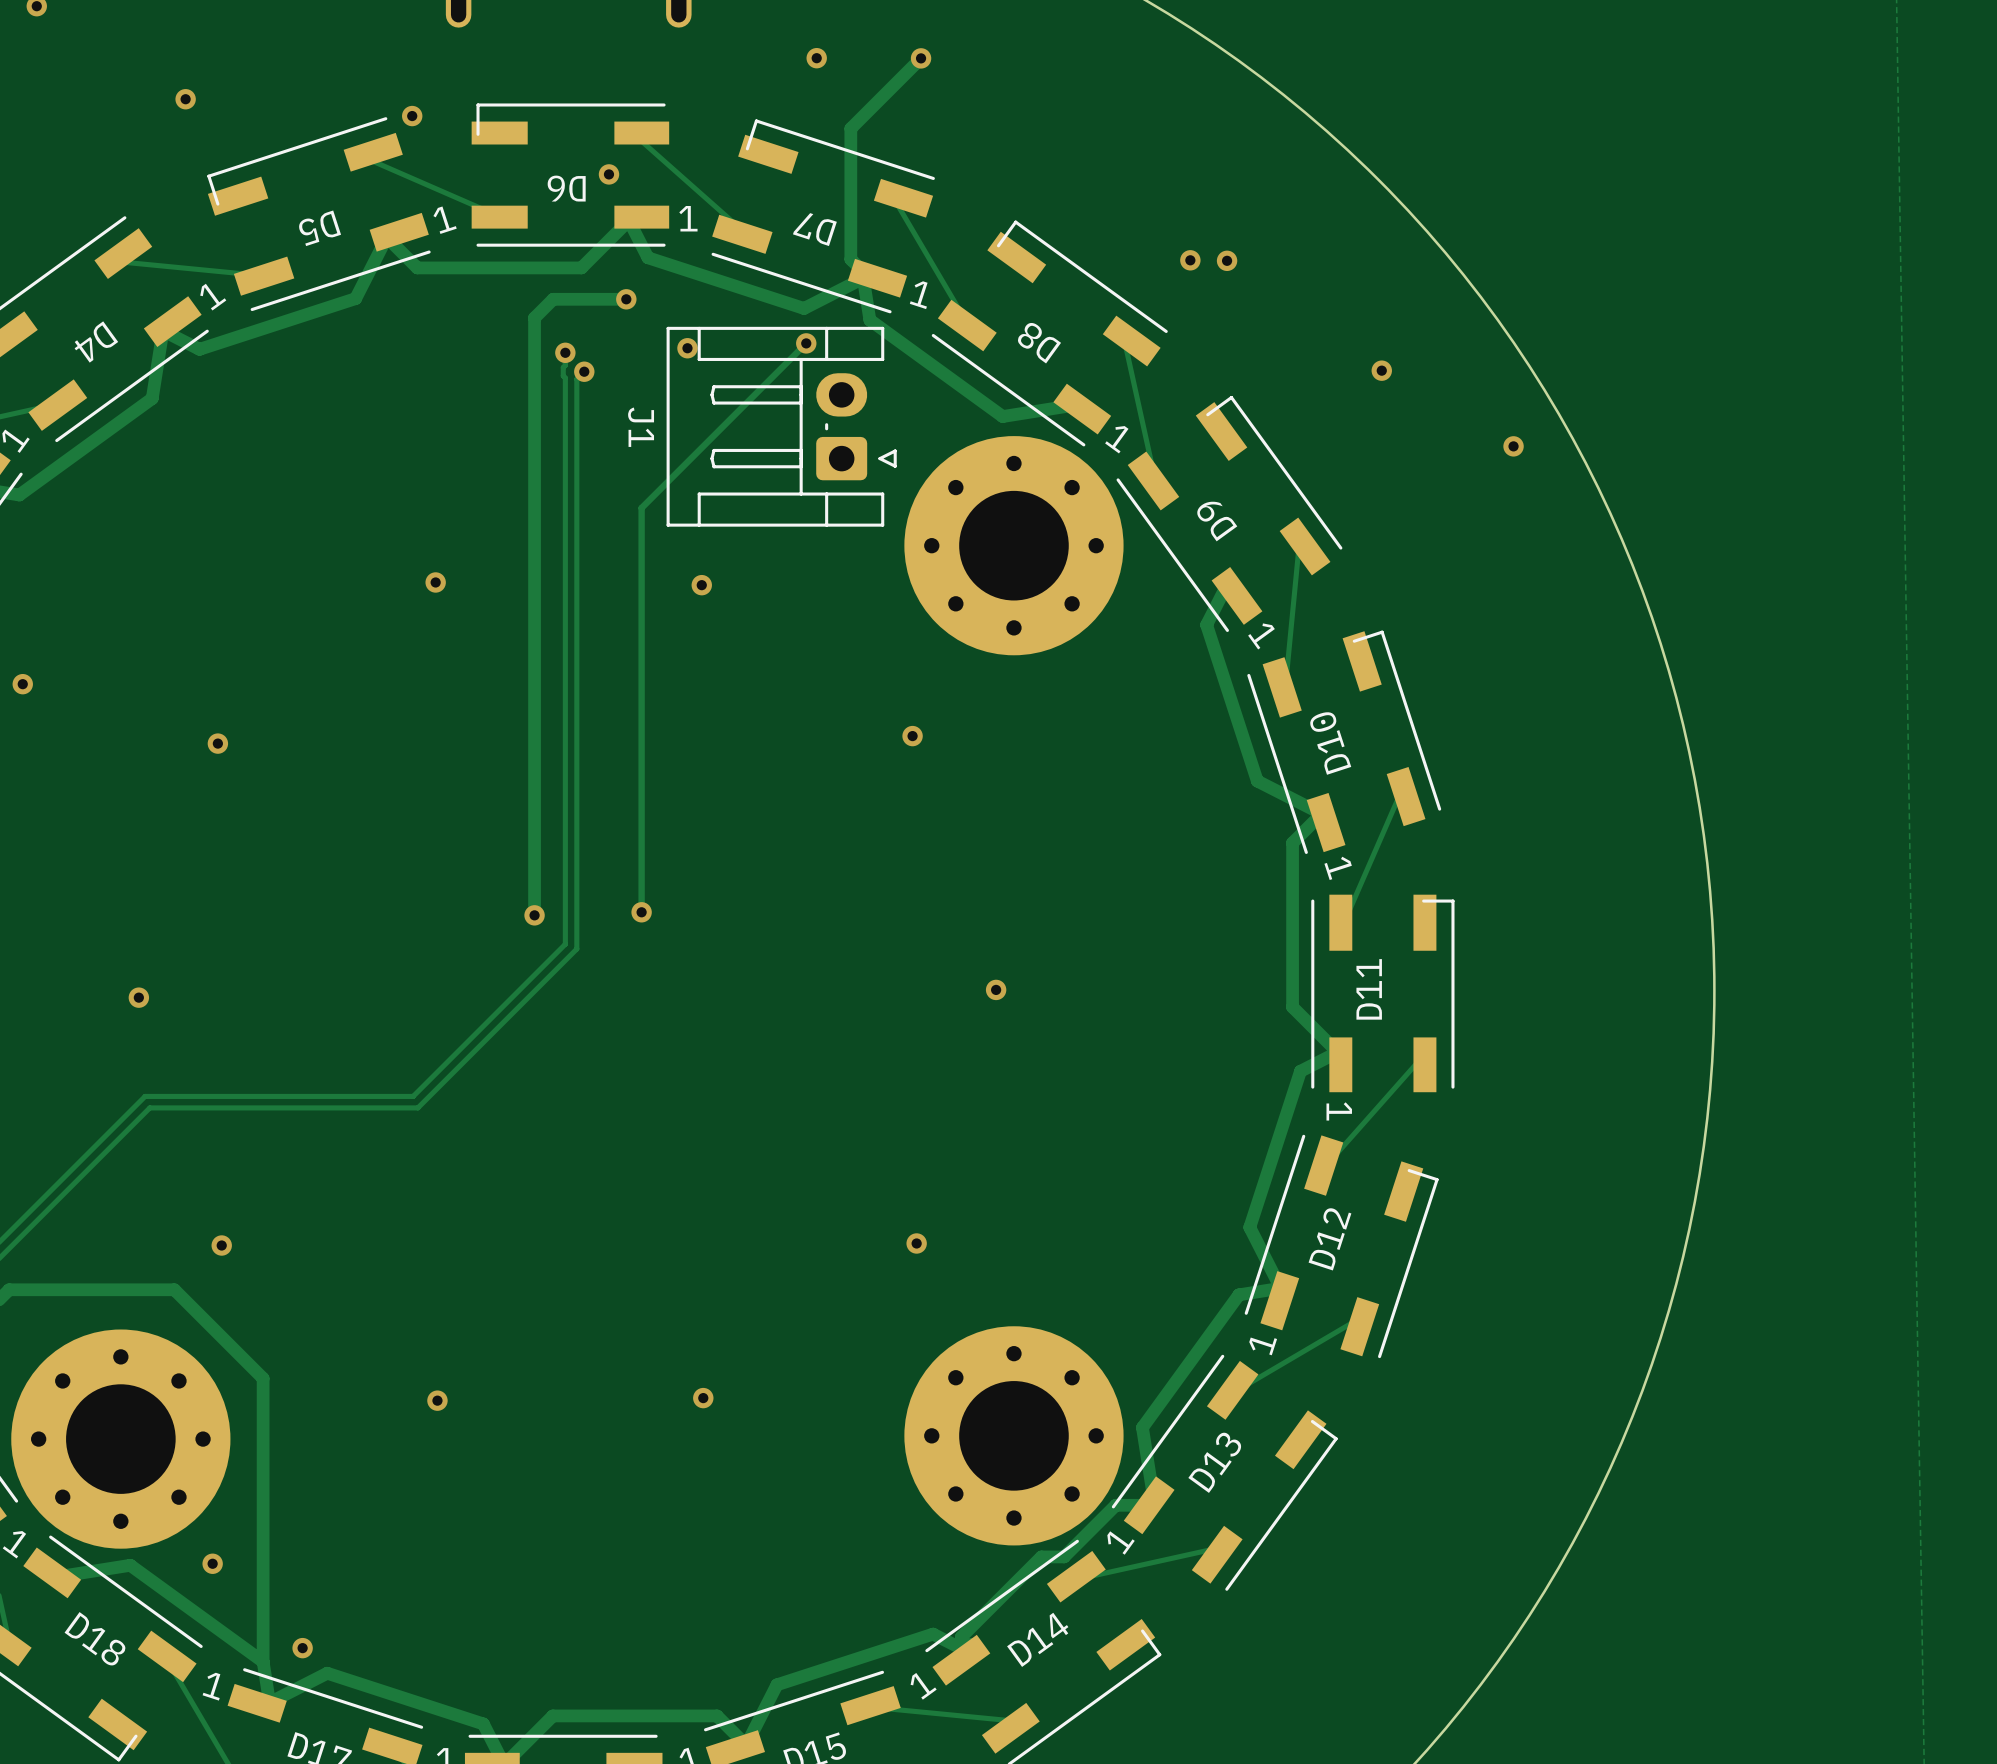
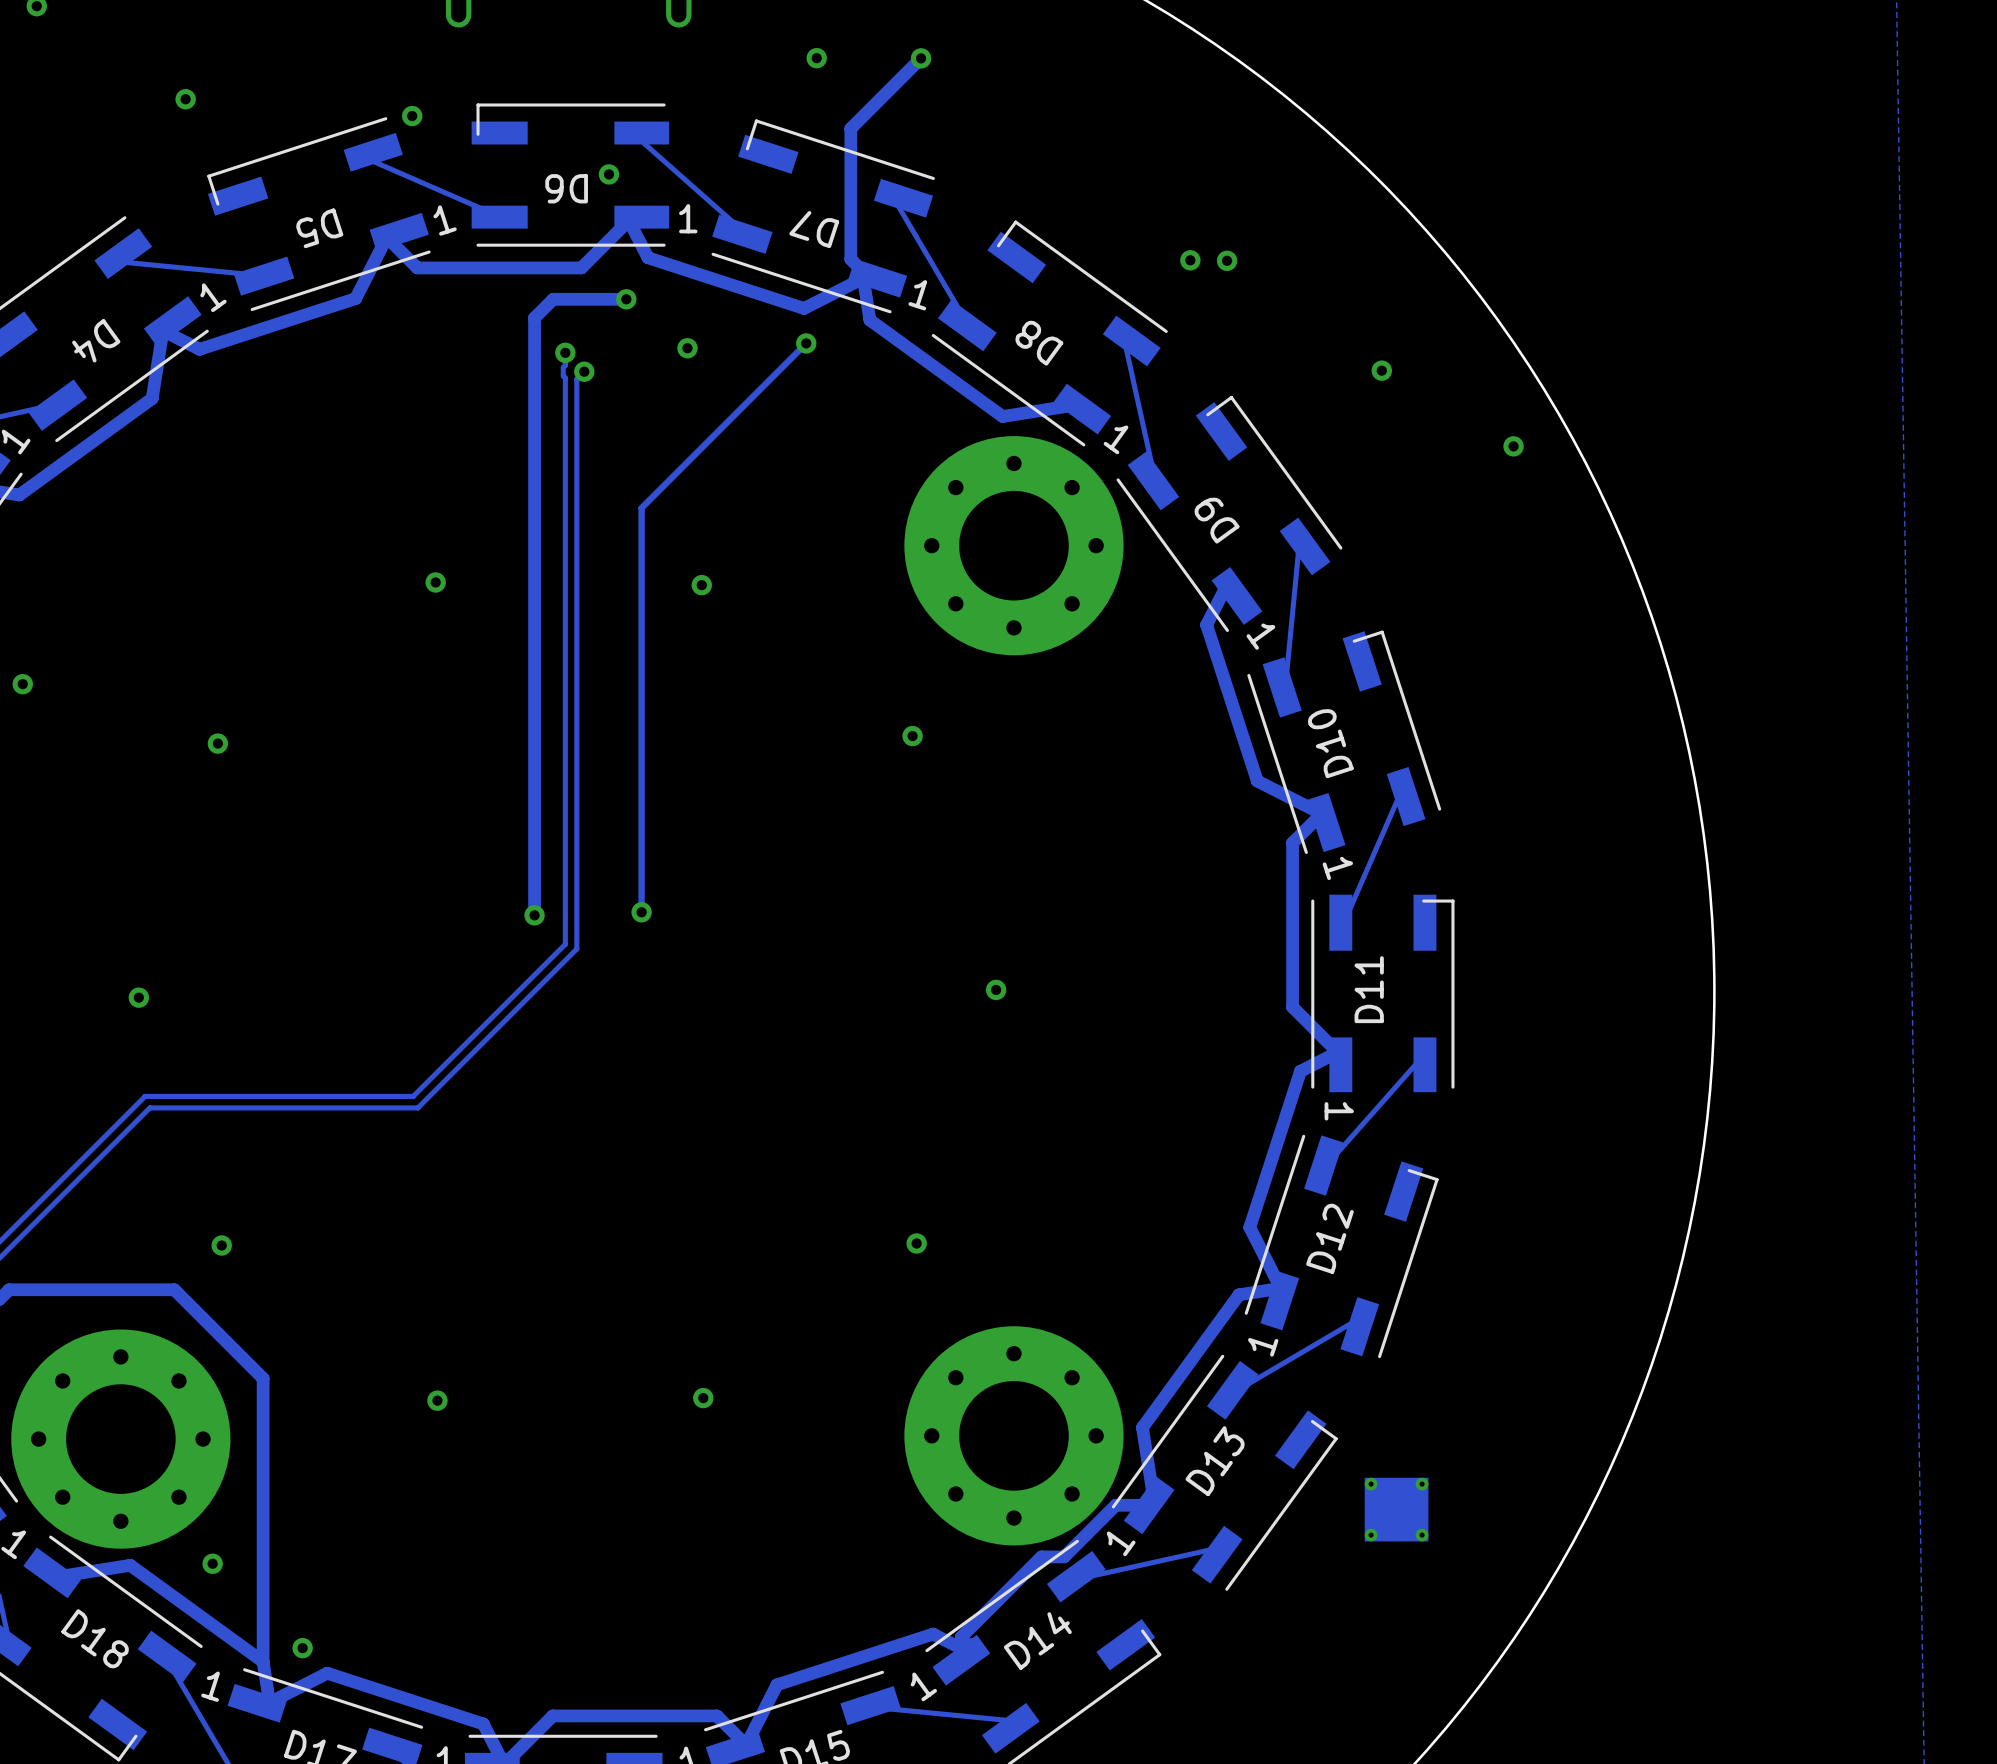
J1: (781, 426) -> none
part: none -> (1396, 1509)

